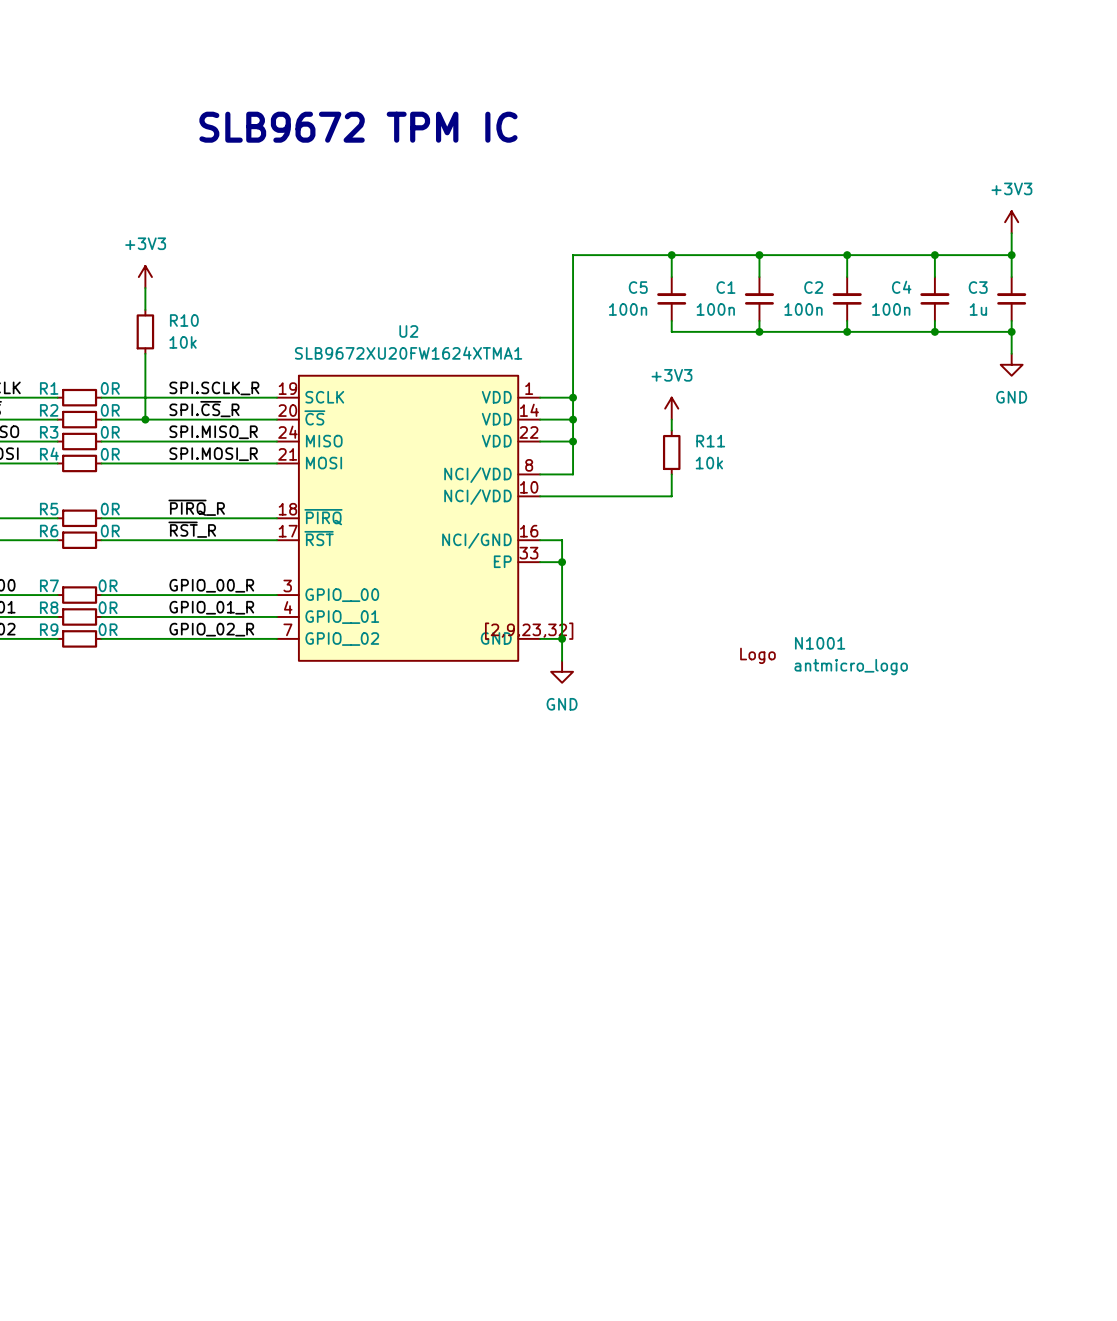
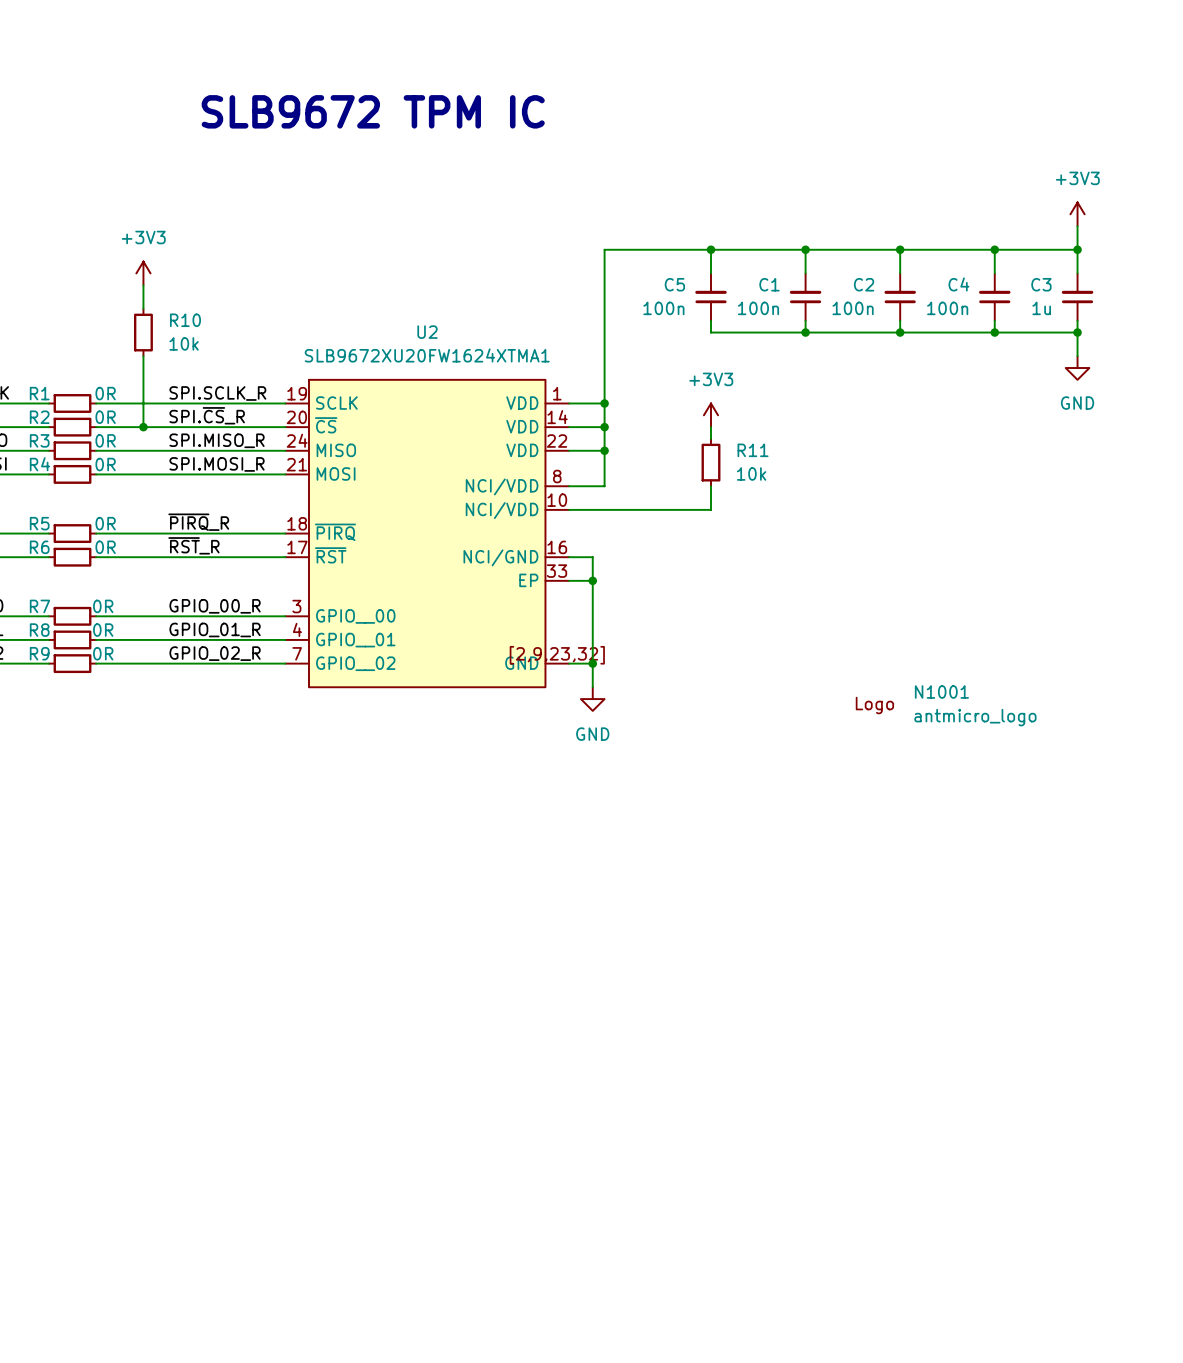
N1001 position: (824, 656) -> (946, 705)

